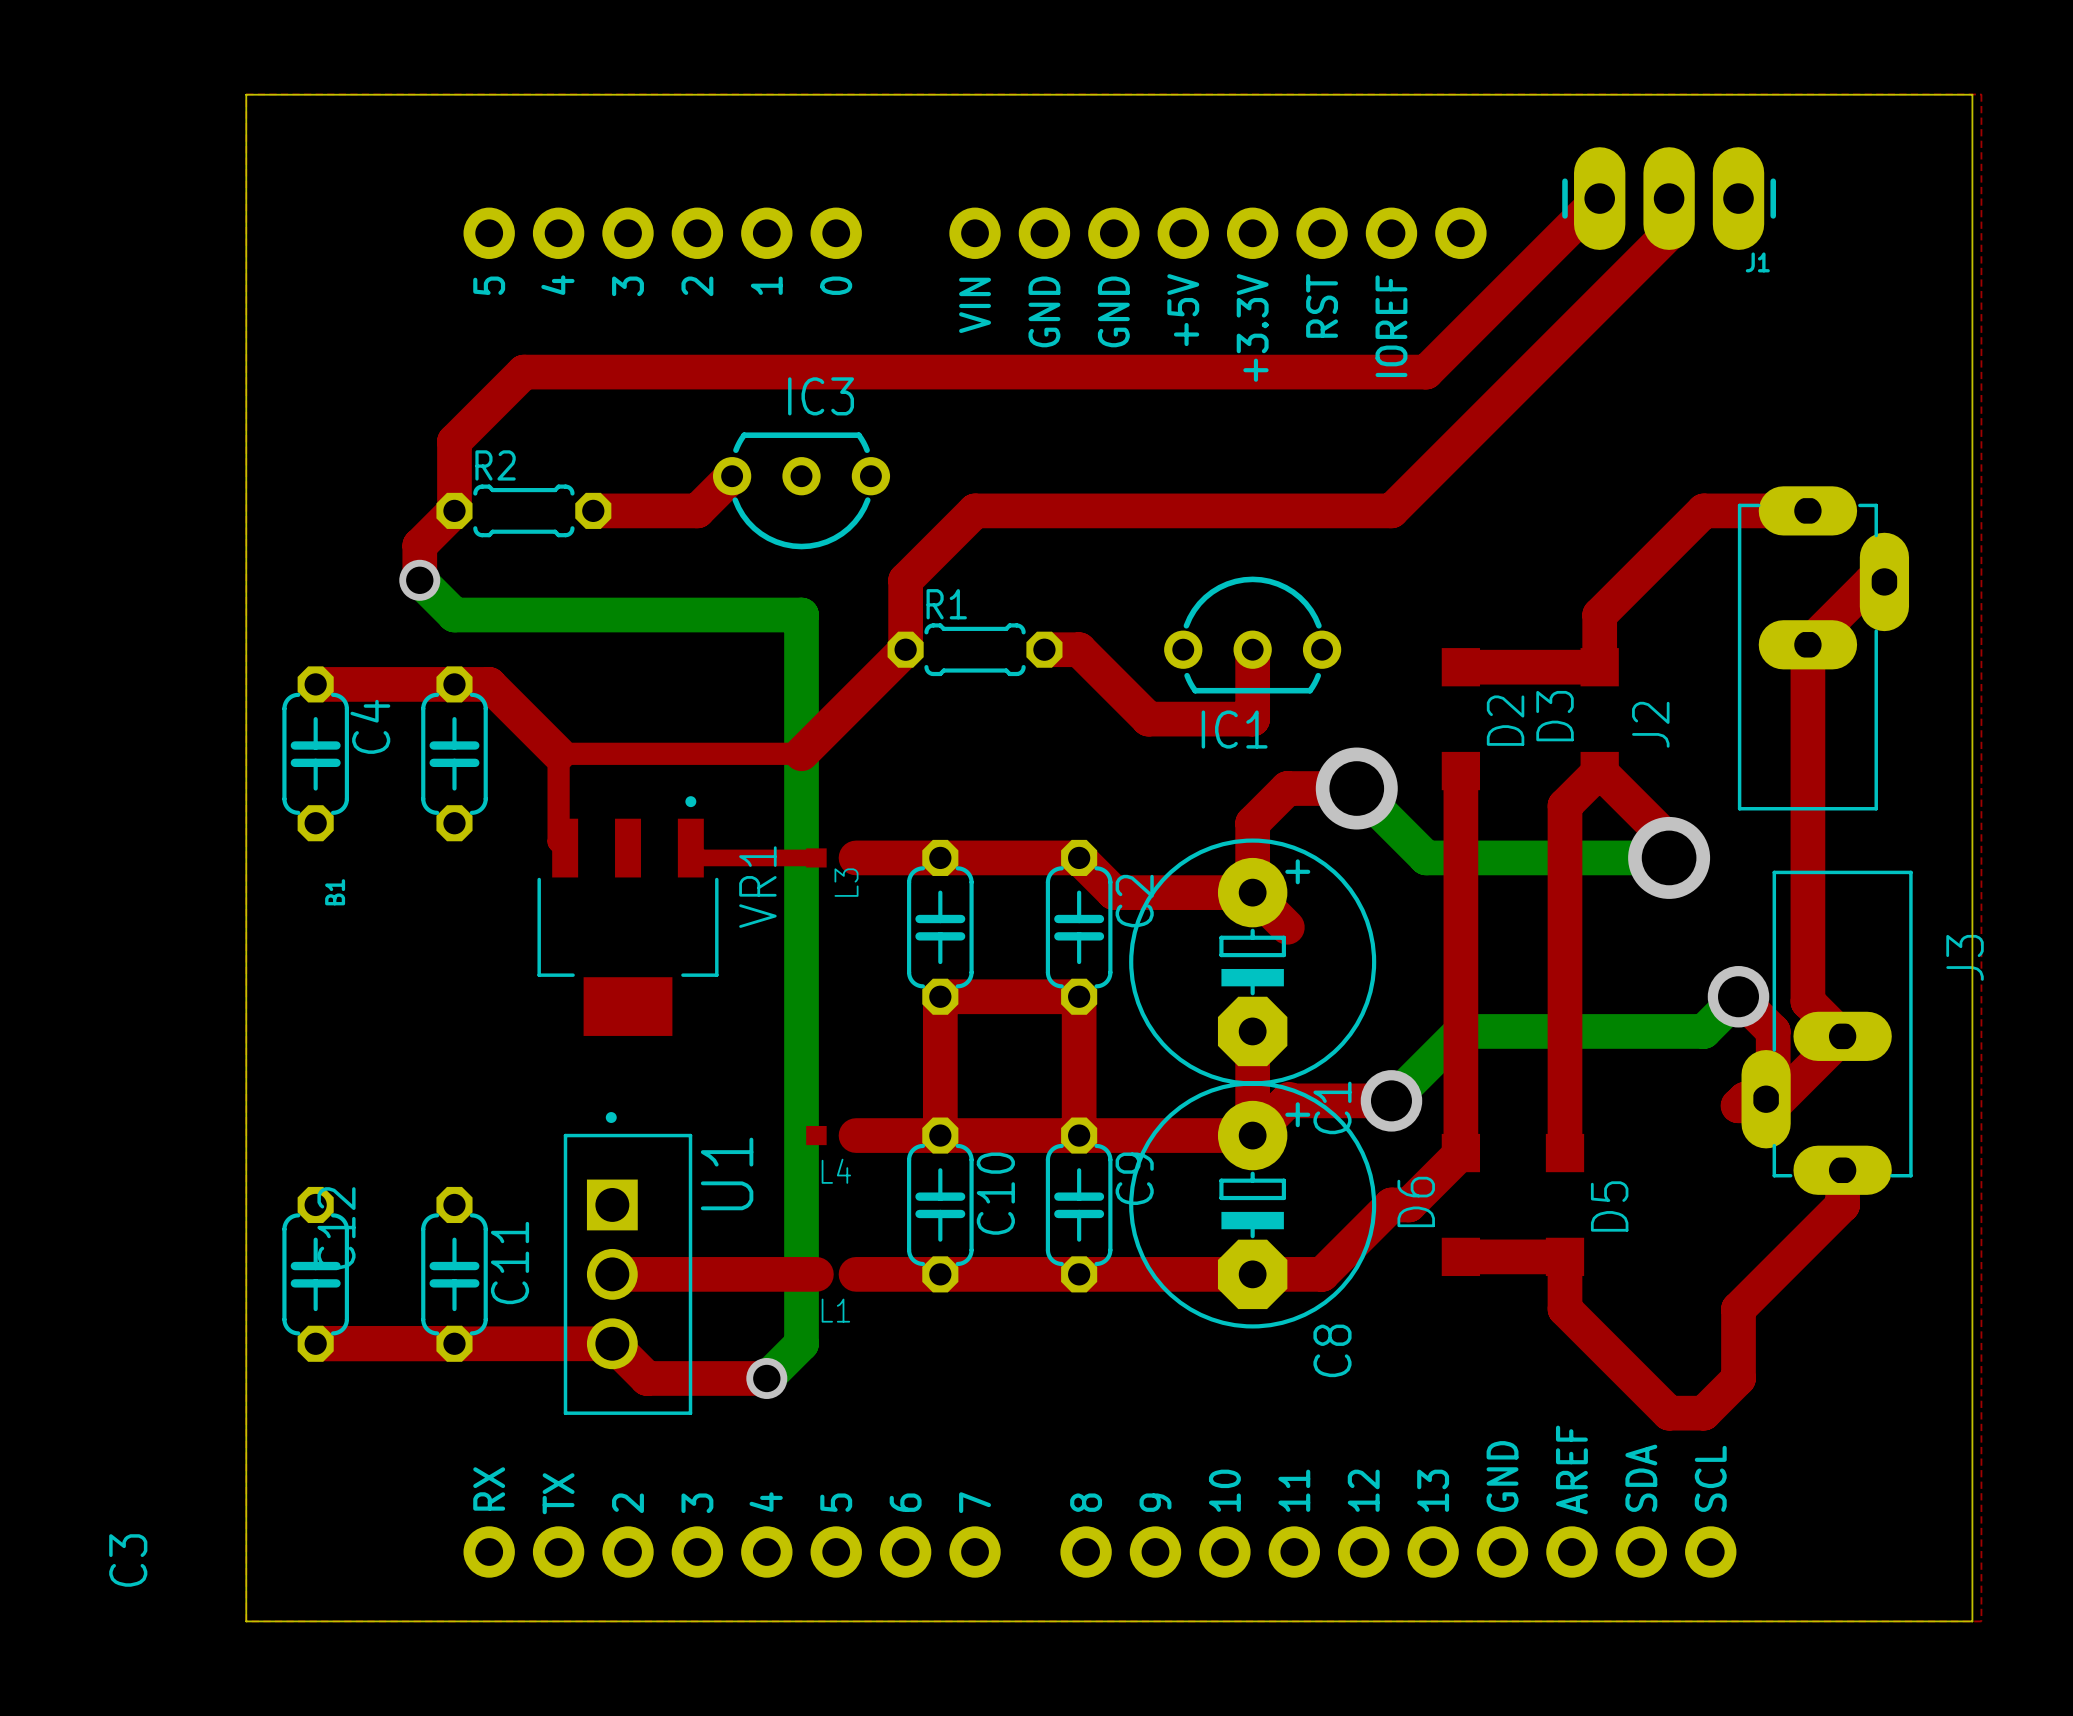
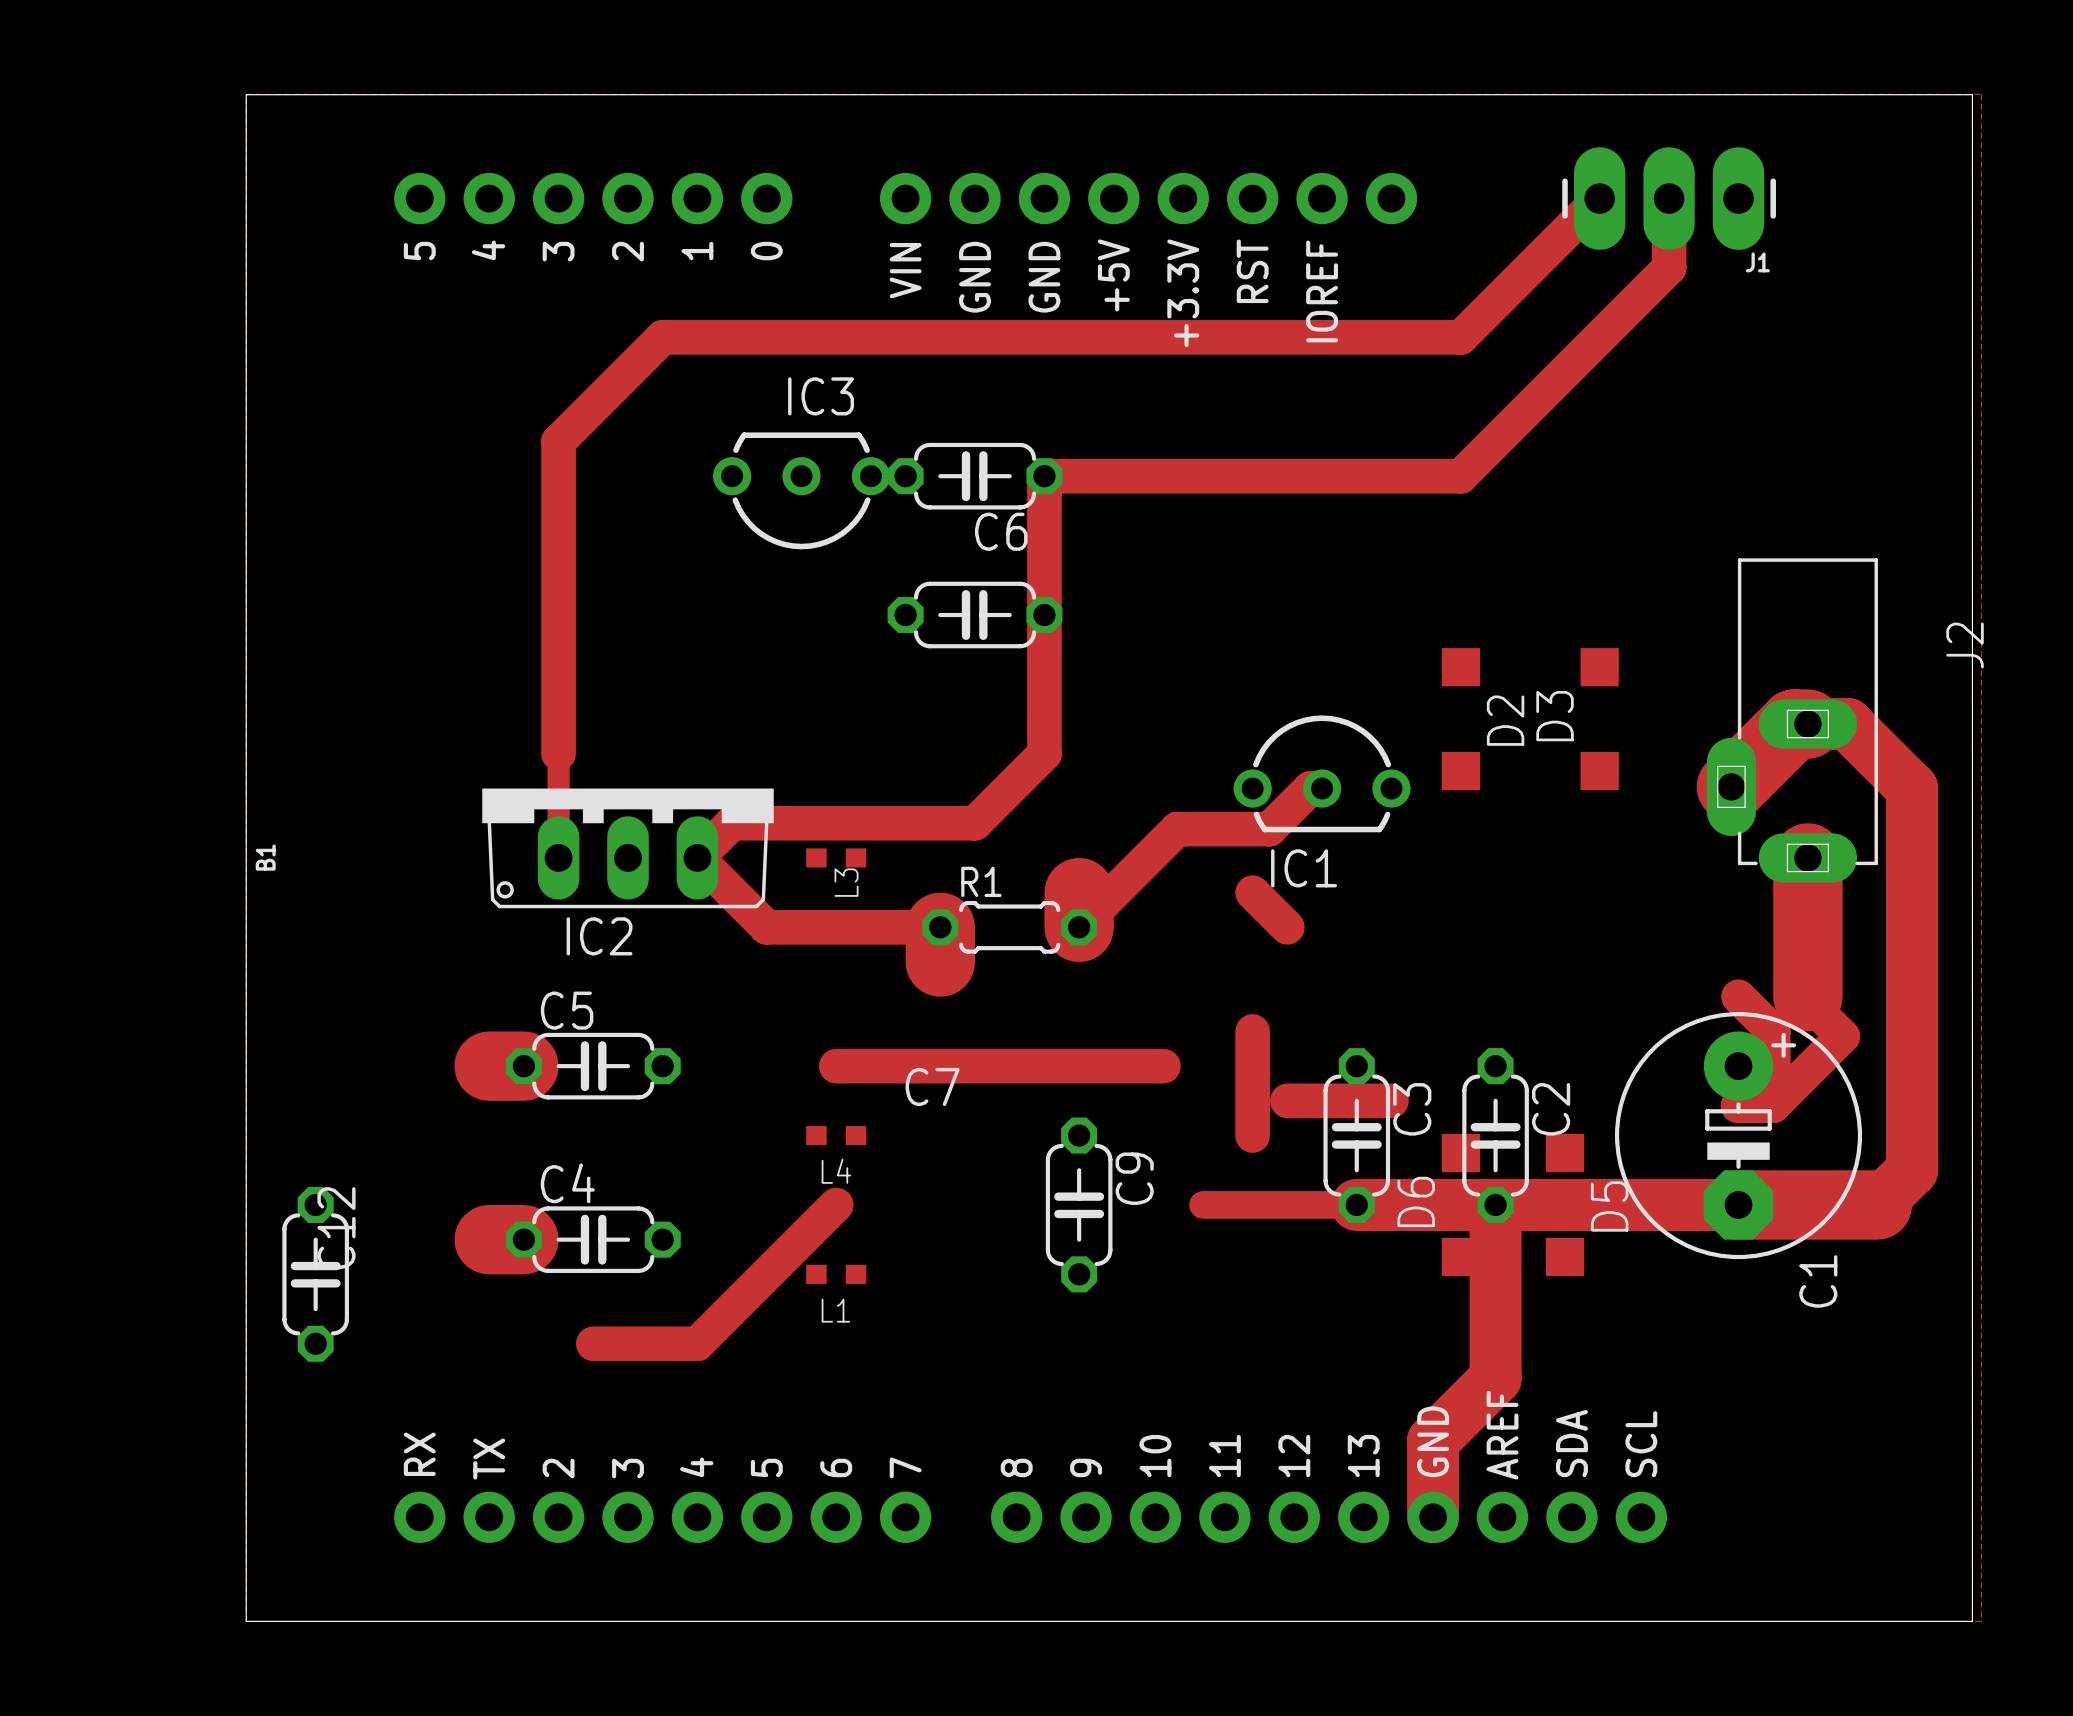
top track: (1669, 233) (1391, 510) (975, 510) (905, 580) (905, 649) (801, 753) (558, 753) (489, 684) (315, 684) -> (1669, 233) (1669, 267) (1460, 476) (1044, 476) (1044, 753) (975, 823) (732, 823) (697, 857) (766, 927) (940, 927) (940, 962)
top track: (1460, 337) (1426, 372) (523, 372) (454, 441) (454, 510) (419, 545) (419, 580) -> (1460, 337) (662, 337) (558, 441) (558, 753)
top track: (732, 476) (697, 510) (593, 510) -> none
C6: none -> (975, 476)
R2: (523, 510) -> none
top track: (1807, 510) (1703, 510) (1599, 615) (1599, 667) (1460, 667) -> none
bottom track: (419, 580) (454, 615) (801, 615) (801, 1343) (766, 1378) -> none
via: (419, 580) -> none
top track: (1884, 581) (1870, 581) (1807, 644) (1807, 857) -> none
C7: none -> (975, 615)
IC1 position: (1252, 635) -> (1322, 773)
J2 rotation: 0° (1823, 648) -> 180° (1792, 720)
R1 position: (975, 649) -> (1009, 927)
top track: (1044, 649) (1079, 649) (1148, 719) (1252, 719) (1252, 649) -> none
C4 rotation: 0° (315, 753) -> 90° counterclockwise (593, 1239)
C4 position: (315, 753) -> (593, 1239)
part: (454, 753) -> none
top track: (1460, 771) (1460, 1153) (1408, 1204) -> (1731, 786) (1794, 724) (1847, 724) (1912, 788) (1912, 1170) (1877, 1204) (1408, 1204)
top track: (1310, 788) (1287, 788) (1252, 823) (1252, 892) (1113, 892) (1079, 857) (856, 857) -> (1310, 788) (1269, 829) (1177, 829) (1079, 927) (1079, 892)
bottom track: (1356, 788) (1426, 857) (1669, 857) -> none
via: (1356, 788) -> none
IC2: none -> (628, 848)
top track: (690, 848) (700, 857) (816, 857) -> none
top track: (1669, 857) (1669, 840) (1599, 771) (1564, 805) (1564, 1153) -> none
via: (1669, 857) -> none
top track width: thin (1807, 857) (1807, 996) -> thick (1807, 857) (1807, 996)
B1 position: (1099, 892) -> (1030, 857)
VR1: (628, 916) -> none
C3 position: (940, 927) -> (1356, 1135)
C2 position: (1079, 927) -> (1495, 1135)
C1 position: (1252, 962) -> (1738, 1135)
bottom track: (1738, 996) (1703, 1031) (1460, 1031) (1391, 1100) -> none
via: (1738, 996) -> none
J3: (1827, 1032) -> none
top track: none -> (489, 1066) (523, 1066)
C5: none -> (593, 1066)
top track: none -> (836, 1066) (1163, 1066)
top track: (1289, 1099) (1252, 1135) (856, 1135) -> none
via: (1391, 1100) -> none
top track: (940, 1135) (940, 996) (1079, 996) (1079, 1135) -> none
top track: (1842, 1170) (1842, 1204) (1738, 1309) (1738, 1378) (1703, 1413) (1669, 1413) (1564, 1309) (1564, 1256) (1460, 1256) -> none
C10: (940, 1204) -> none
C8: (1252, 1204) -> none
top track: (1391, 1204) (1322, 1274) (856, 1274) -> (1391, 1204) (1203, 1204)
top track: none -> (1495, 1204) (1495, 1378) (1433, 1440) (1433, 1517)
top track: none -> (489, 1239) (523, 1239)
U1: (628, 1263) -> none
C11: (454, 1274) -> none
top track: (612, 1274) (816, 1274) -> none
top track: (315, 1343) (593, 1343) -> none
top track: (612, 1343) (647, 1378) (766, 1378) -> (612, 1343) (697, 1343) (836, 1204)
via: (766, 1378) -> none
C3 name position: C3 (128, 1560) -> C3 (1412, 1109)

